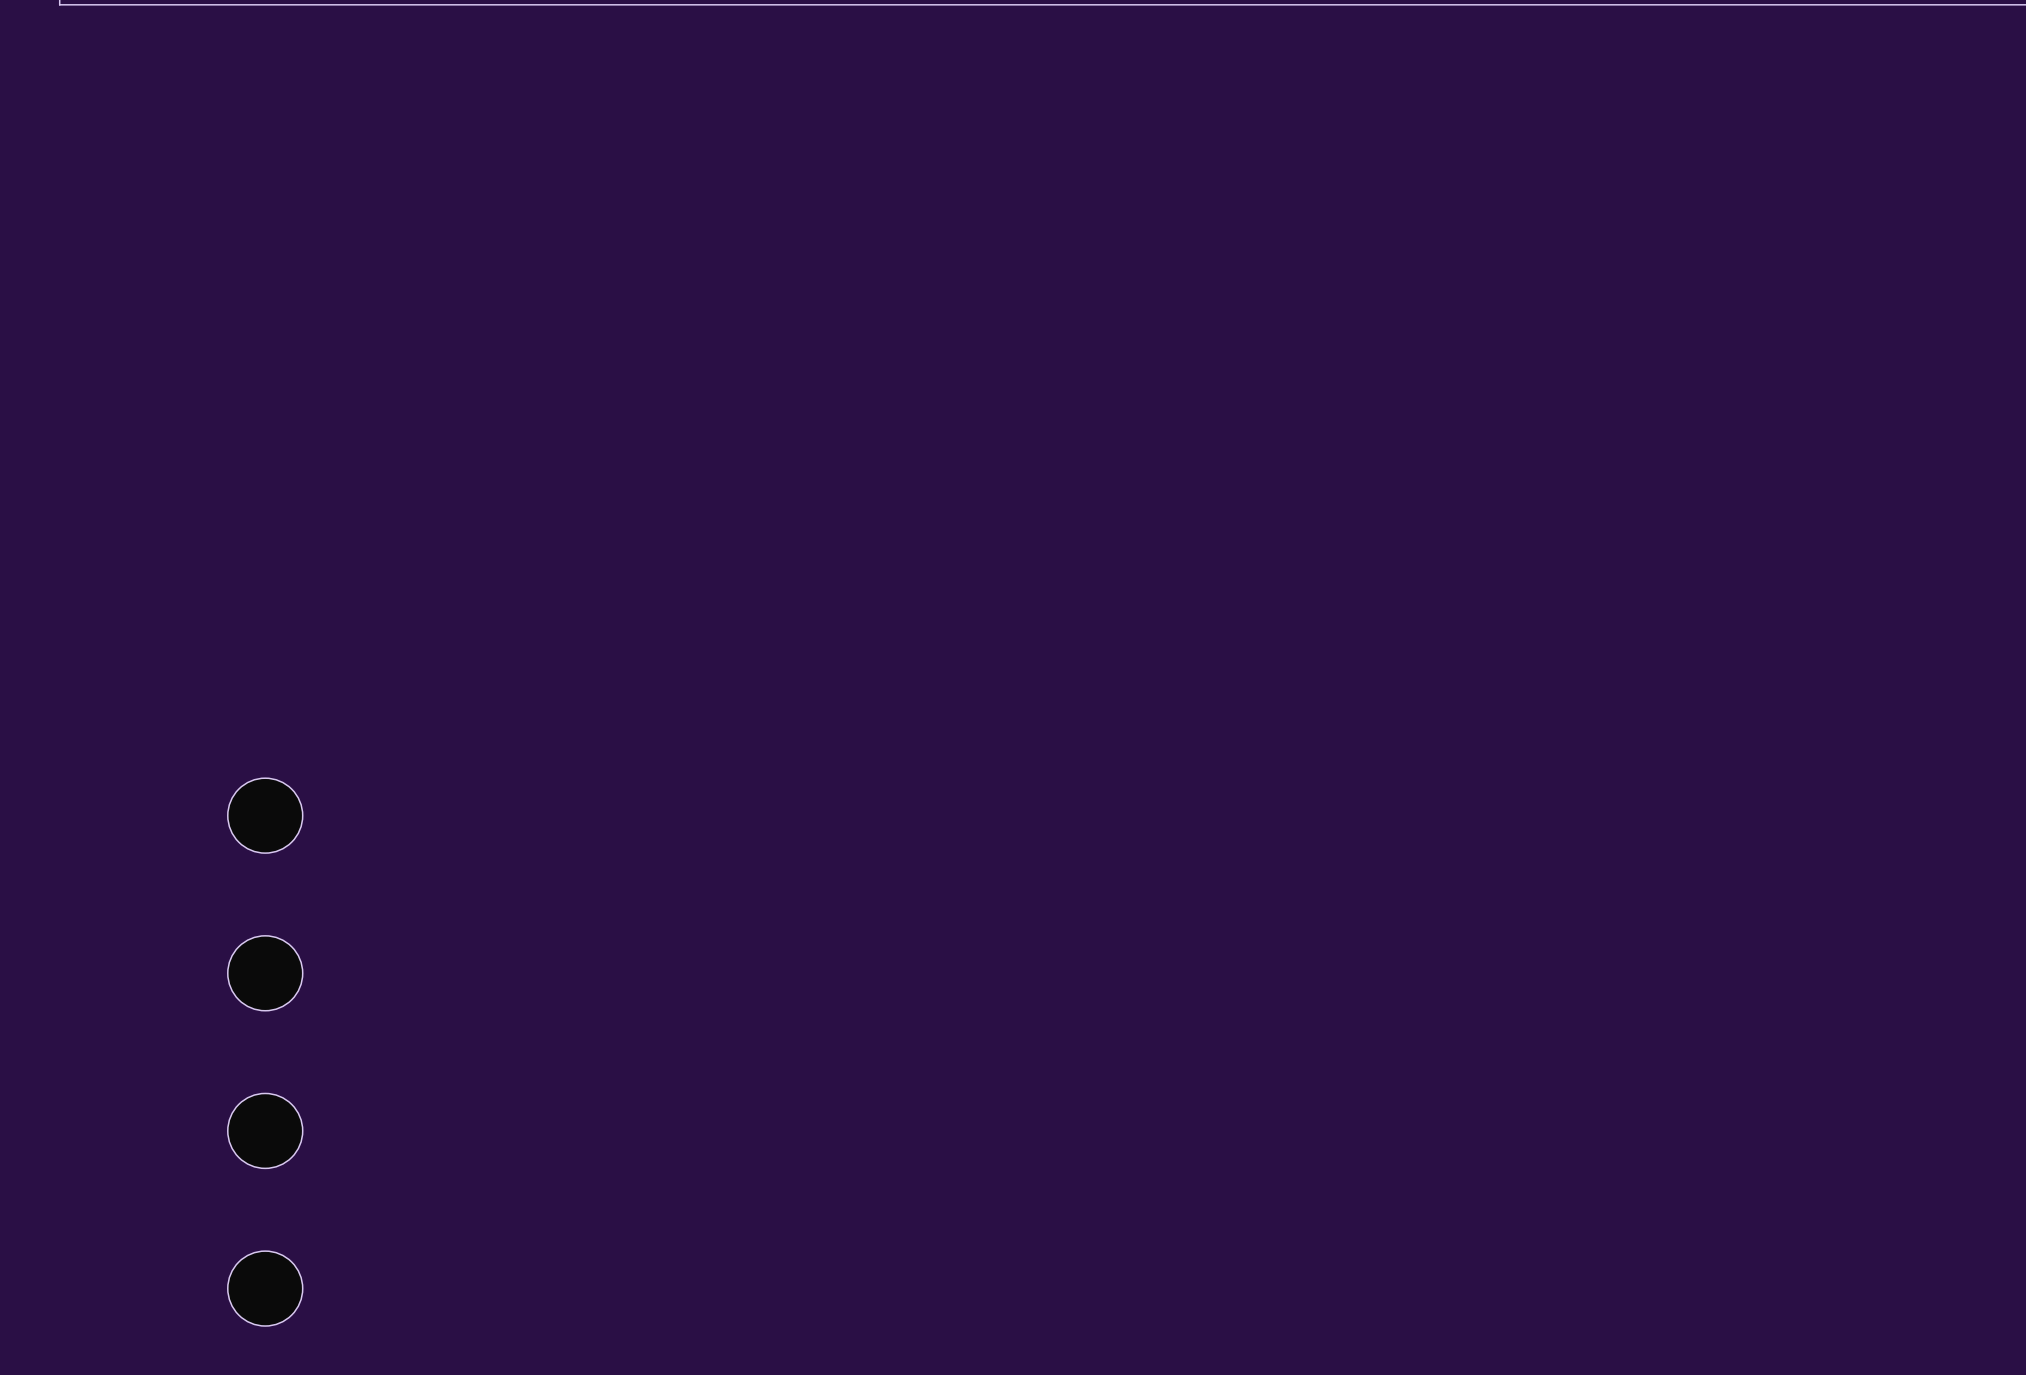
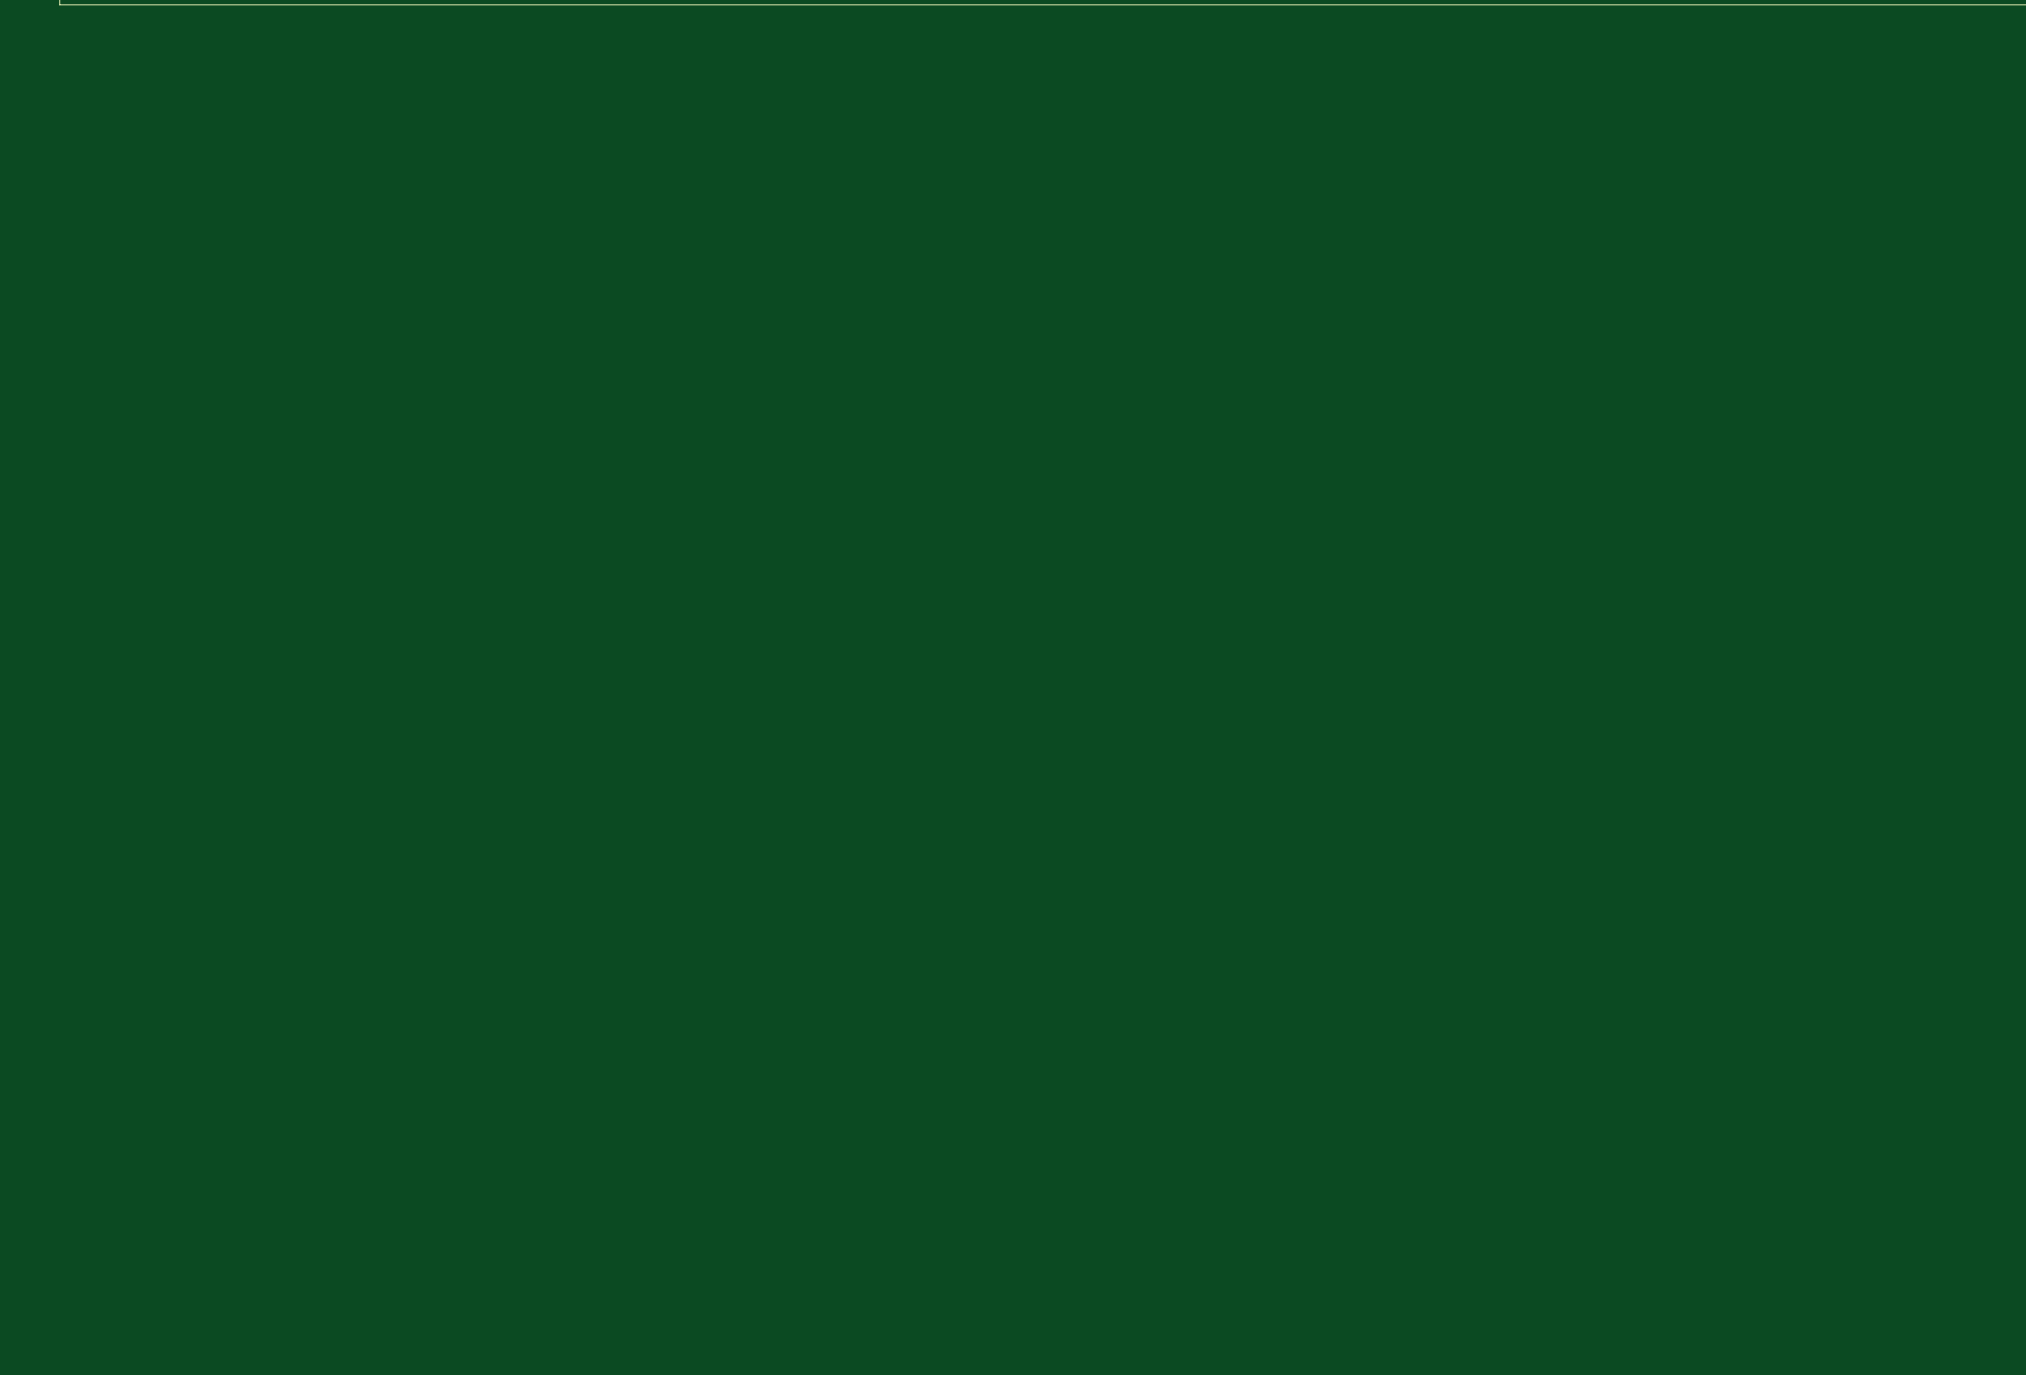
part: (265, 815) -> none
part: (265, 973) -> none
part: (265, 1130) -> none
part: (265, 1288) -> none

